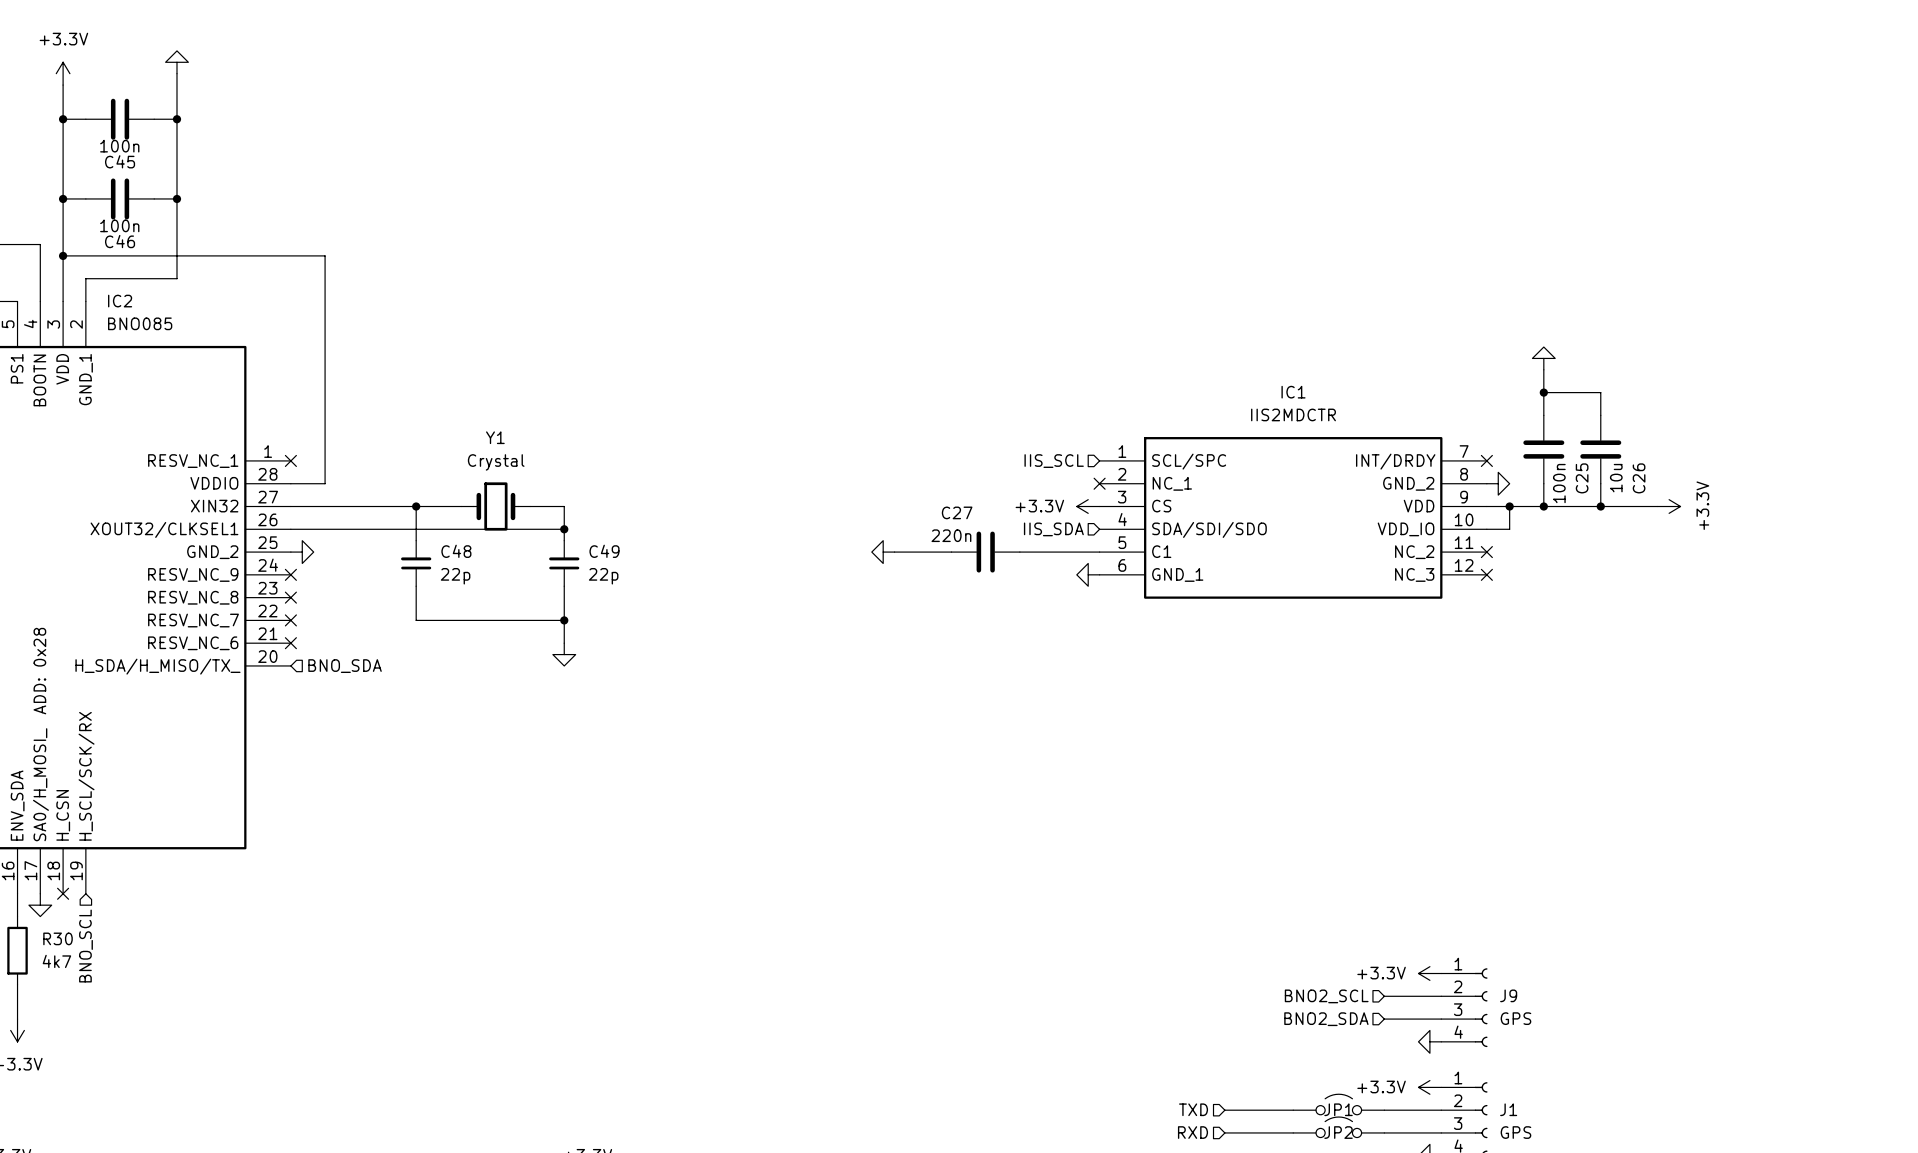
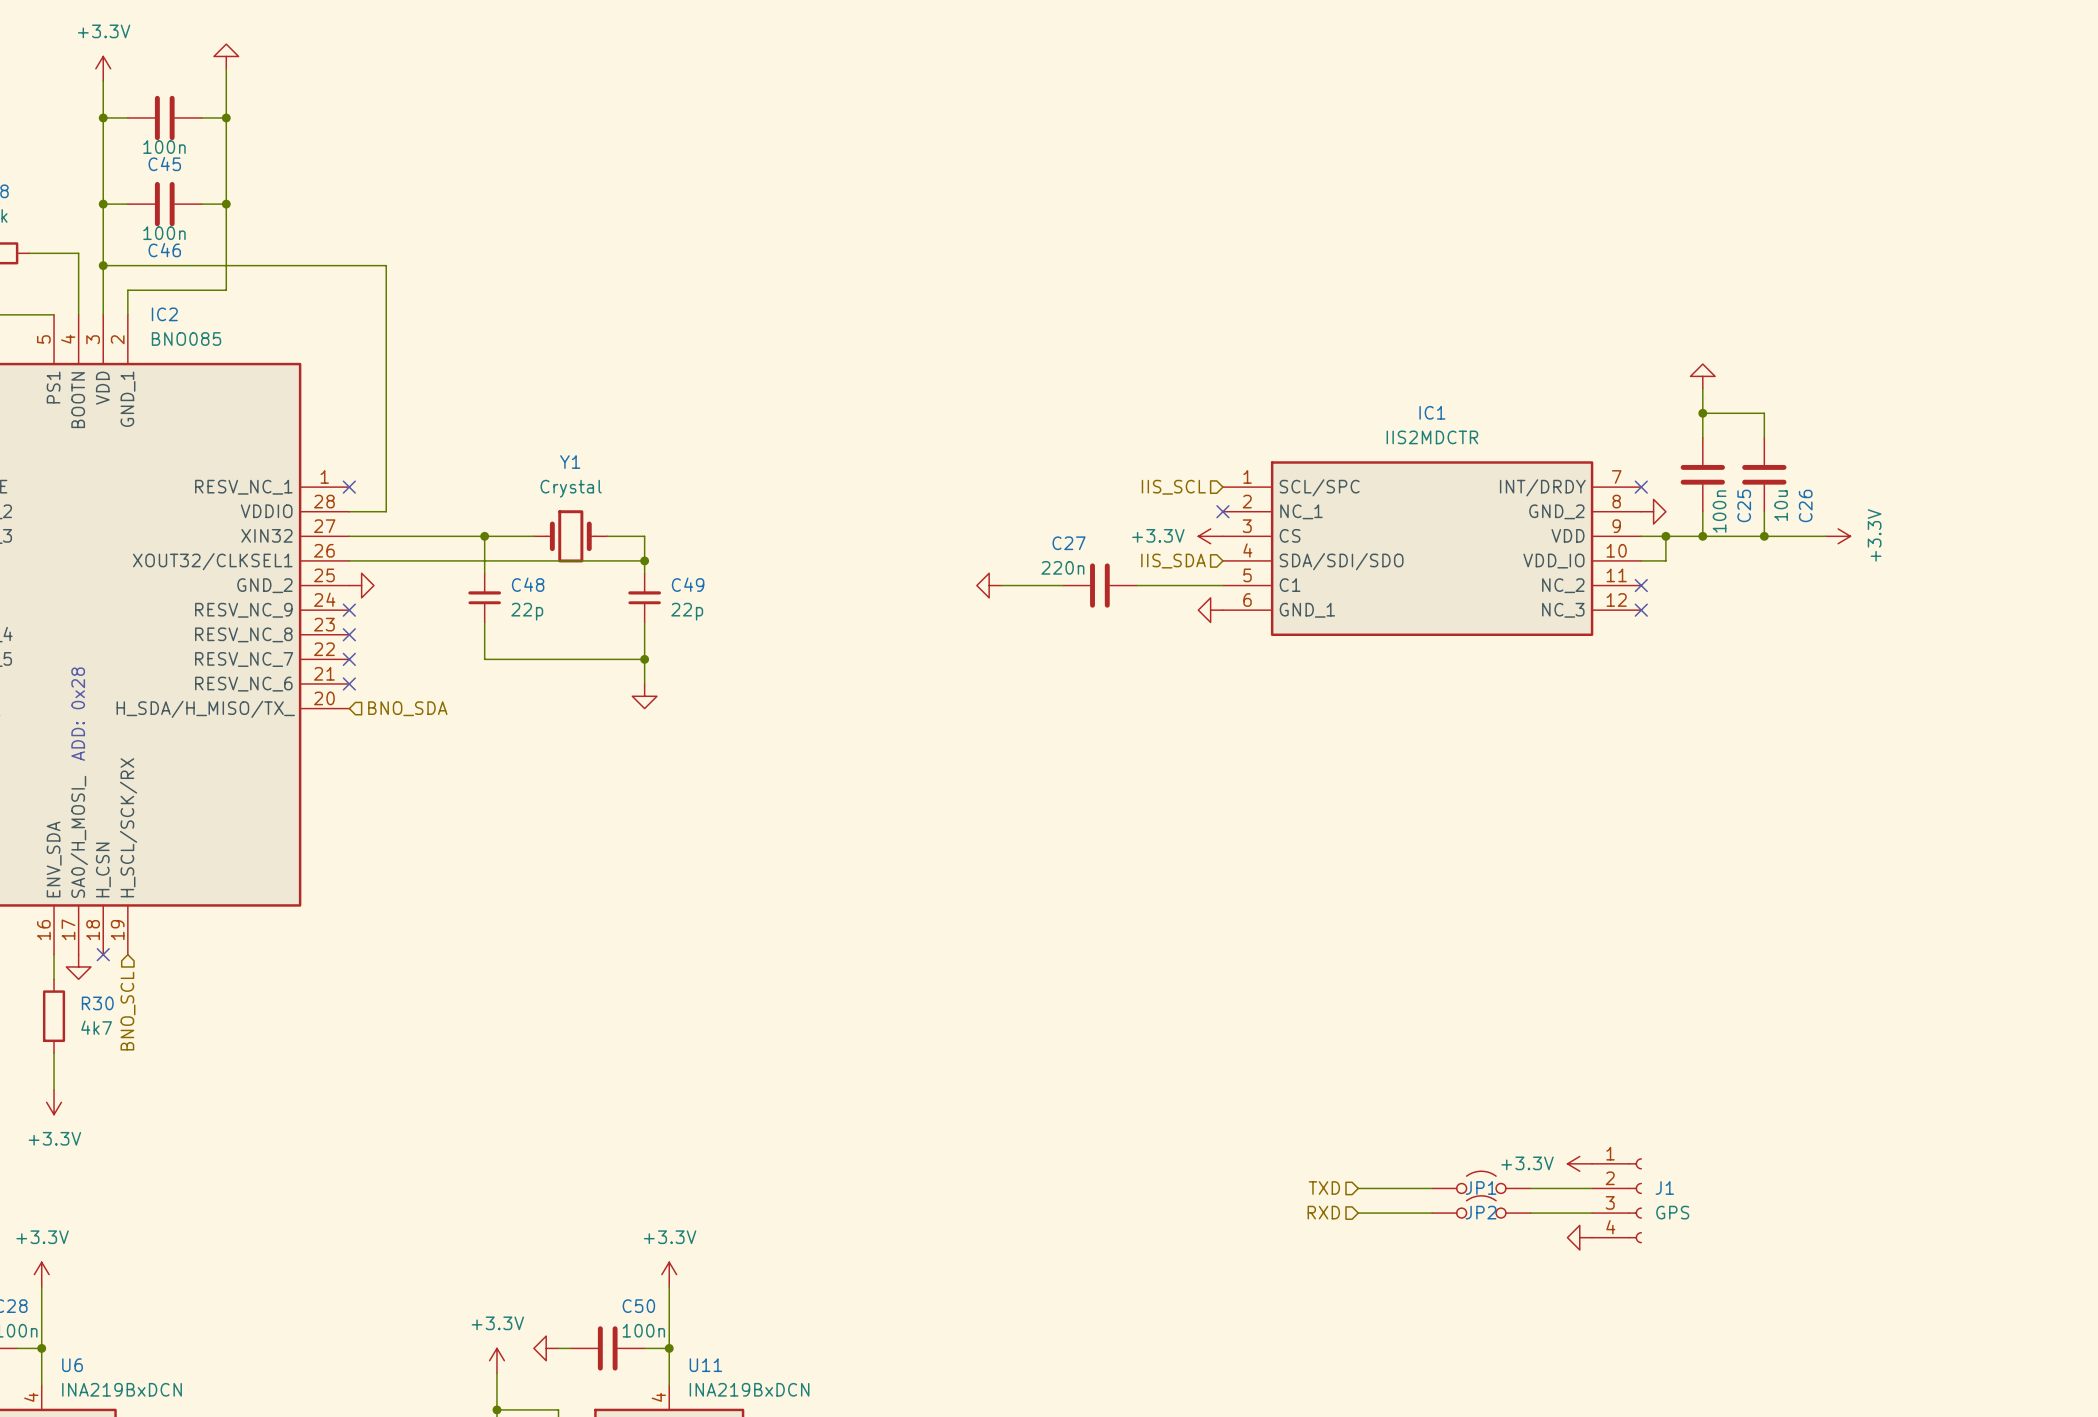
power symbol: +3.3V (1429, 973) -> none
hierarchical label: BNO2_SCL (1326, 996) -> none
wire: (1384, 996) (1441, 996) -> none
J9: GPS (1464, 1007) -> none
hierarchical label: BNO2_SDA (1326, 1019) -> none
wire: (1384, 1019) (1441, 1019) -> none
power symbol: (1429, 1041) -> none

